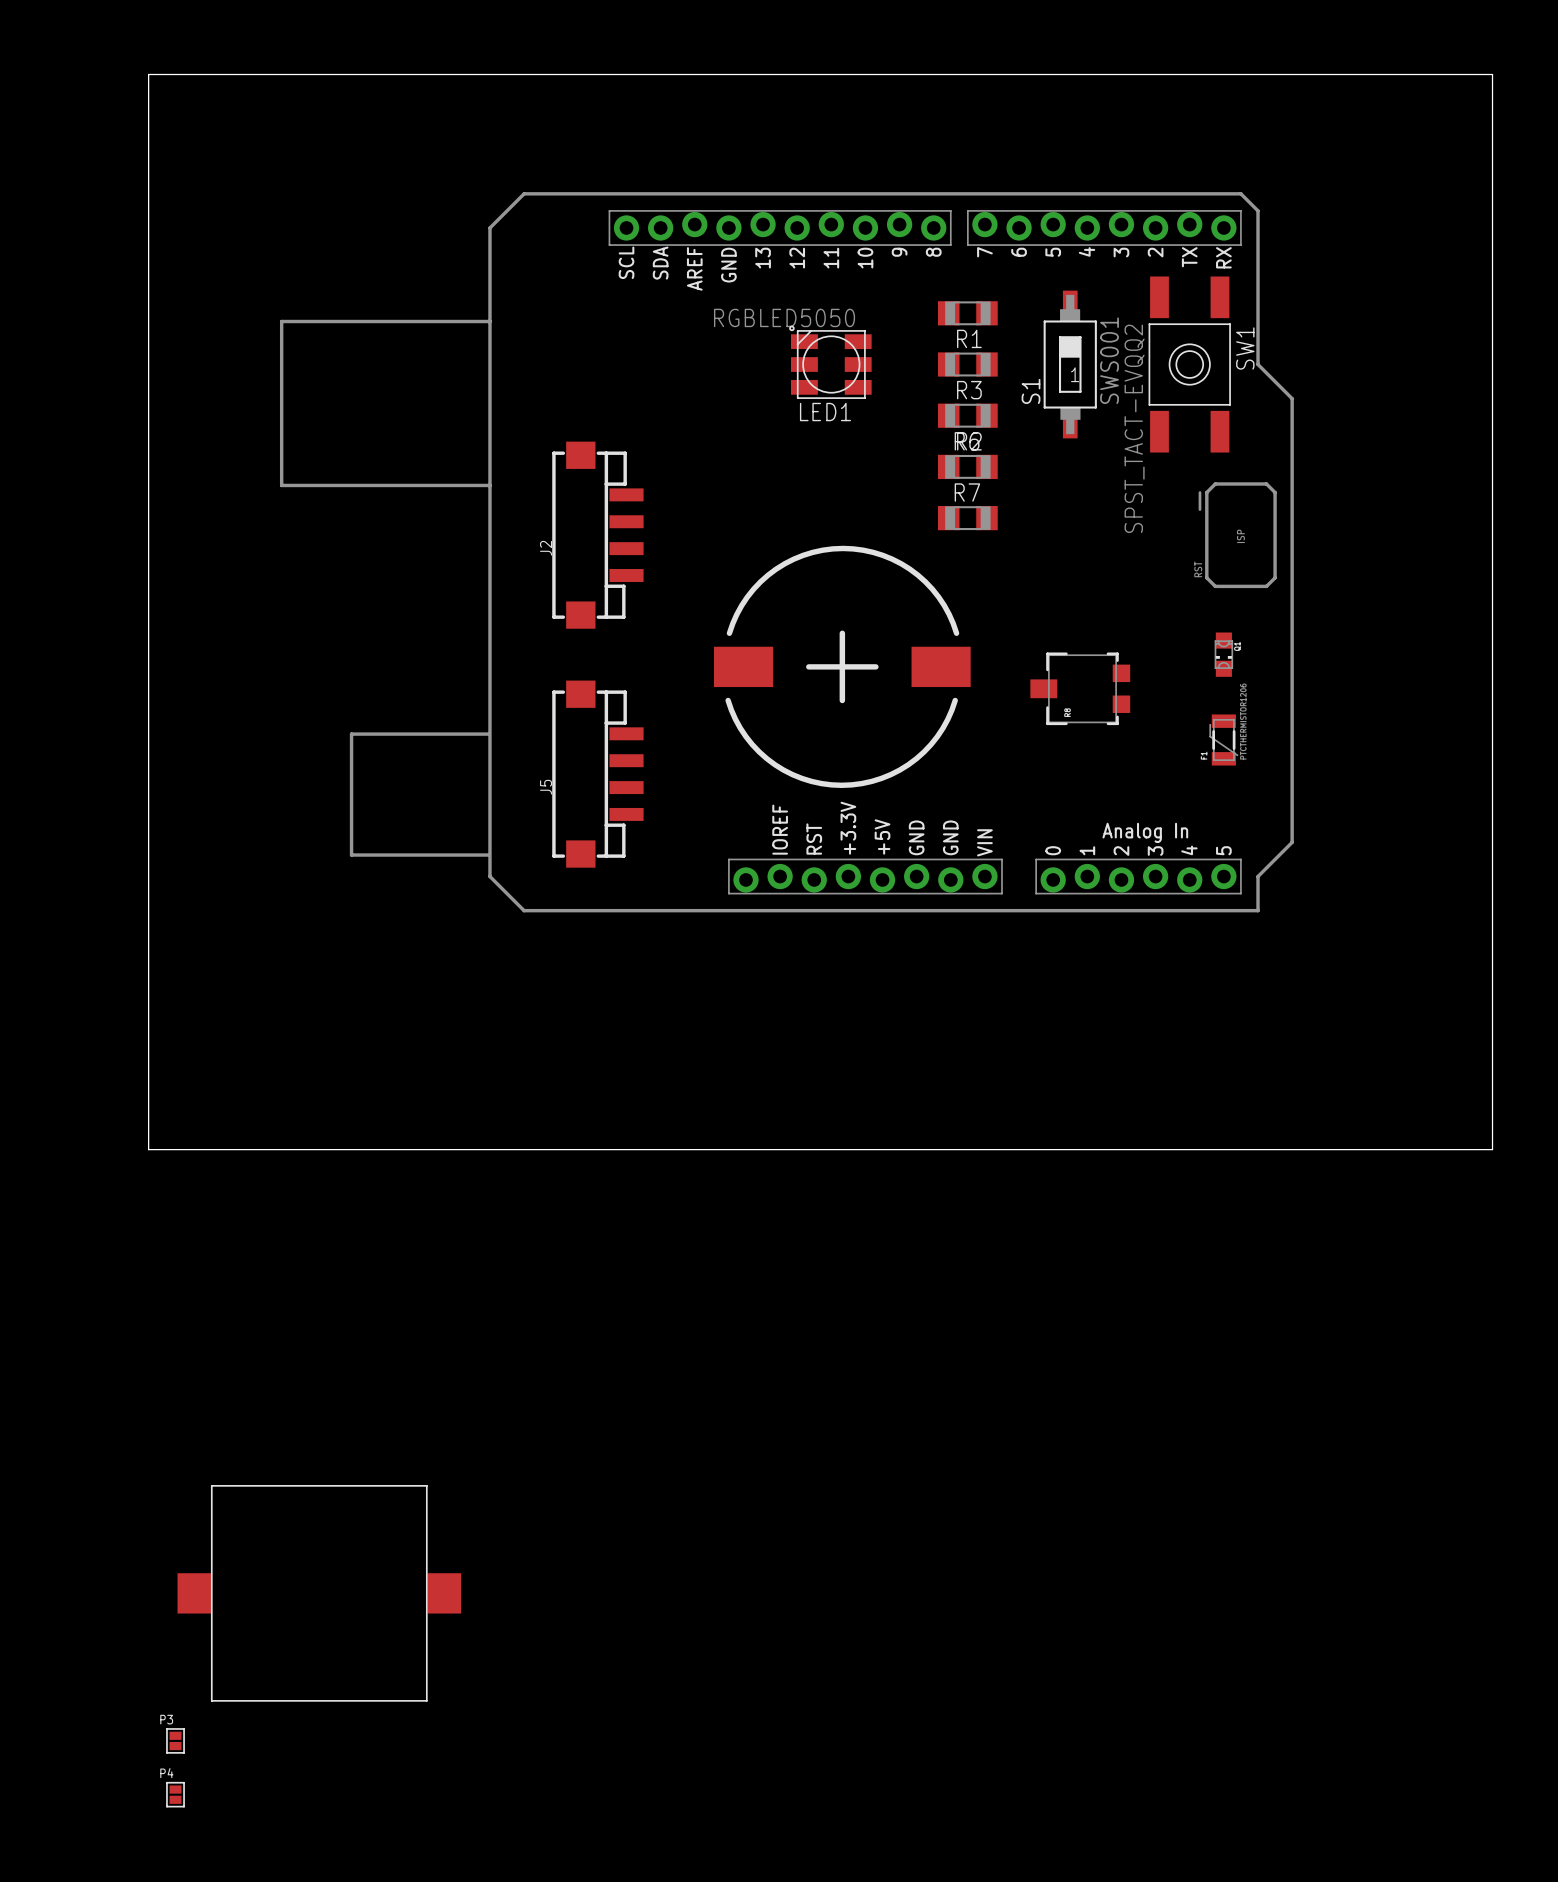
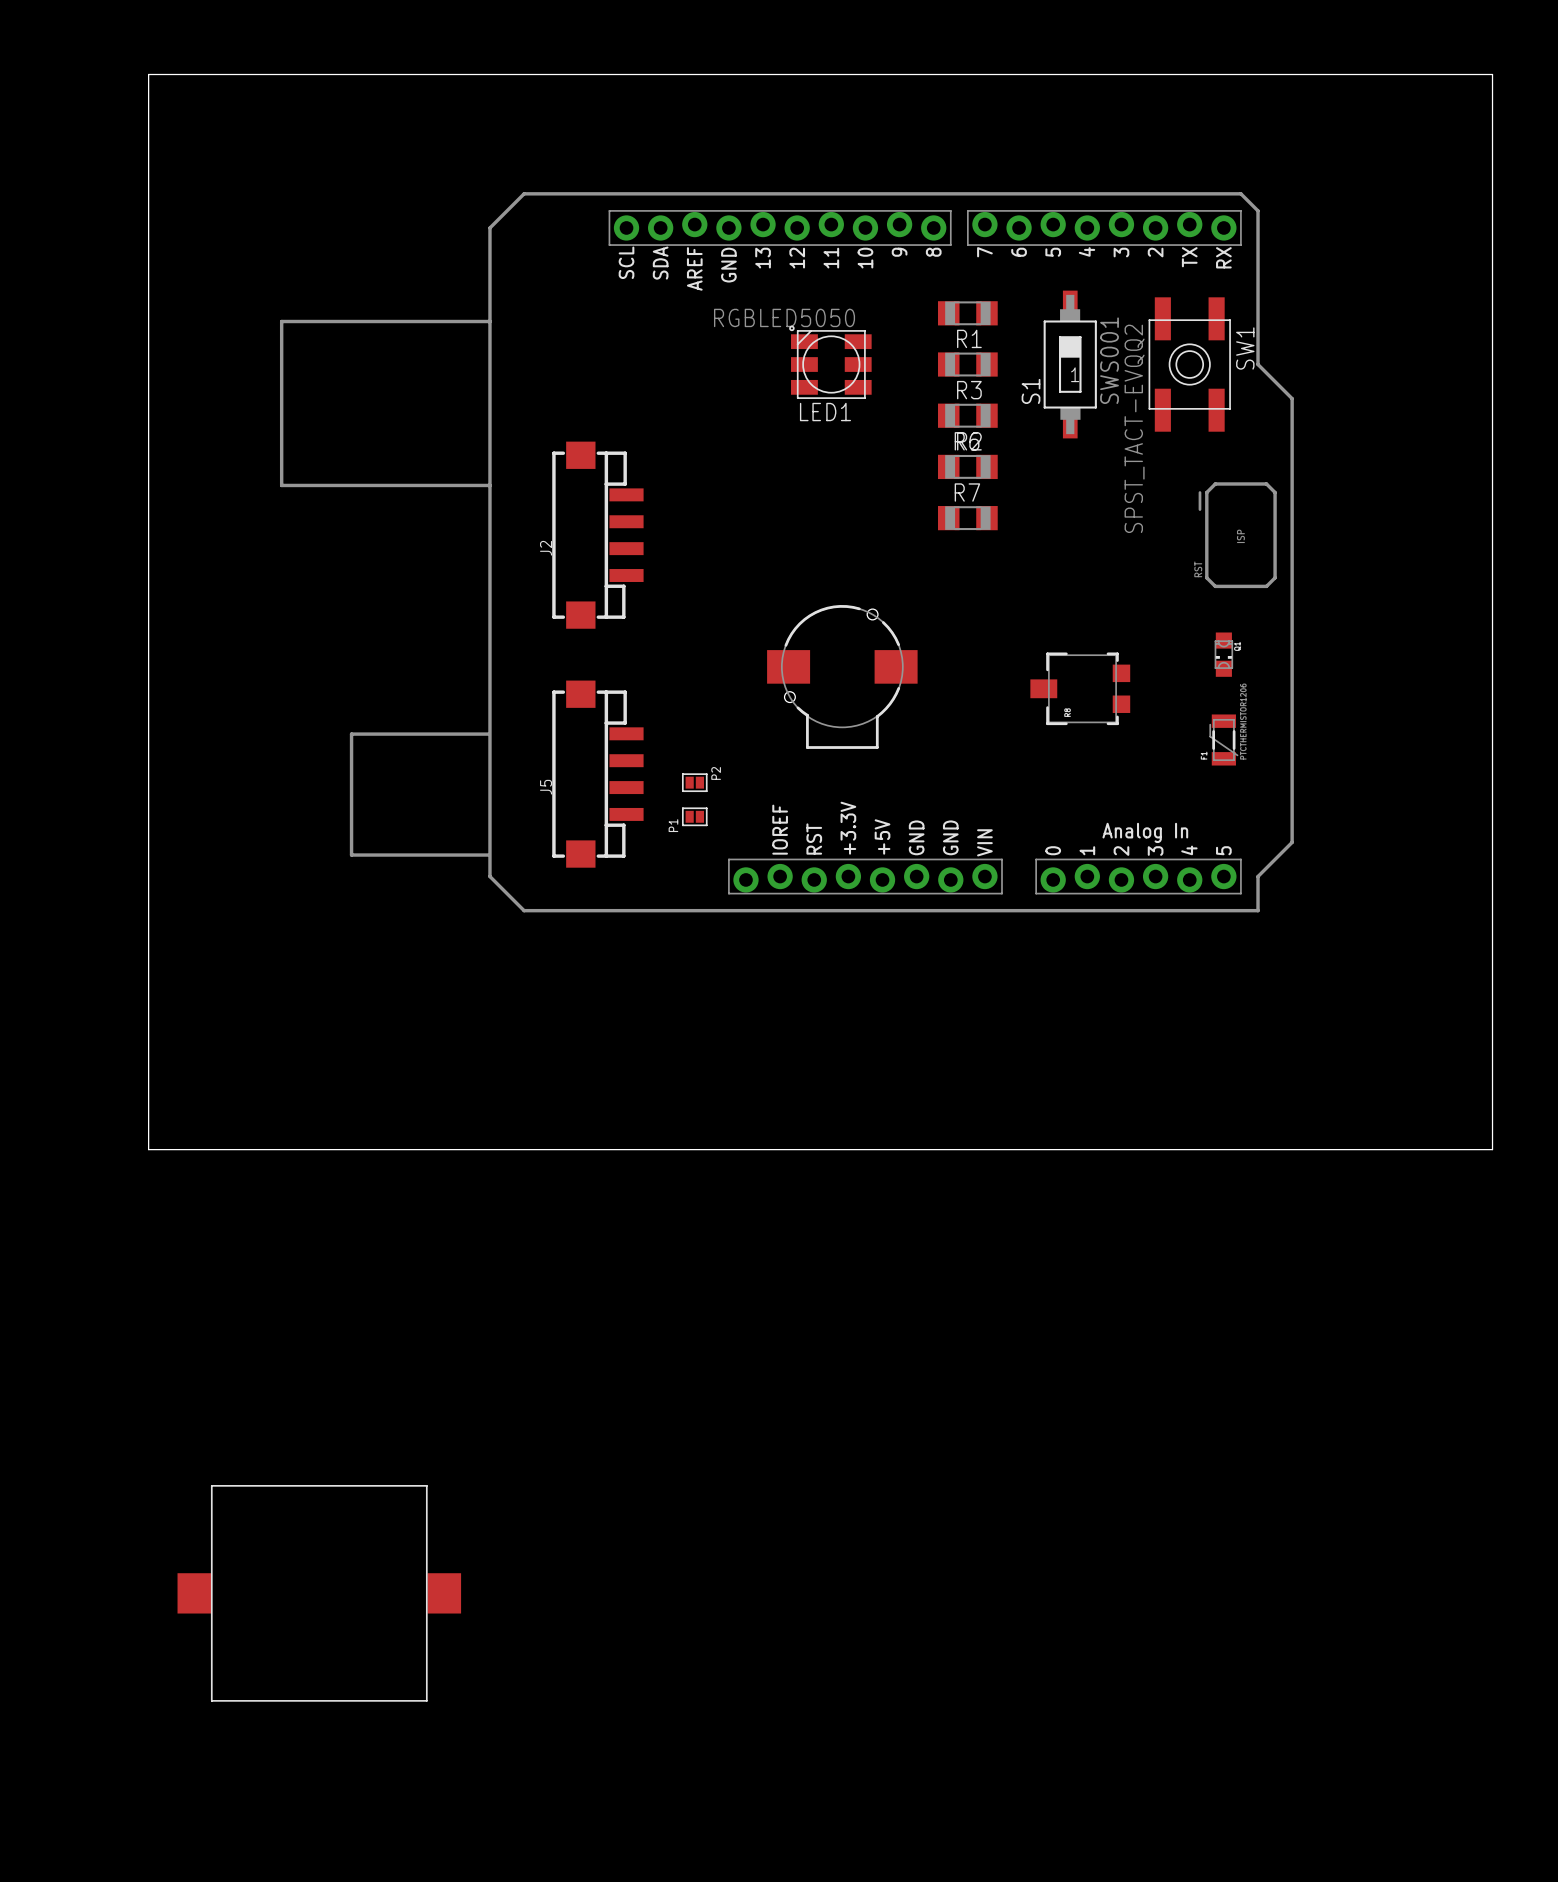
SW1 footprint: [1148, 276, 1231, 453] -> [1148, 297, 1231, 432]
part footprint: [714, 545, 971, 789] -> [767, 605, 918, 749]
P2: none -> (694, 782)
P1: none -> (694, 816)
P3: (175, 1740) -> none
P4: (175, 1794) -> none

